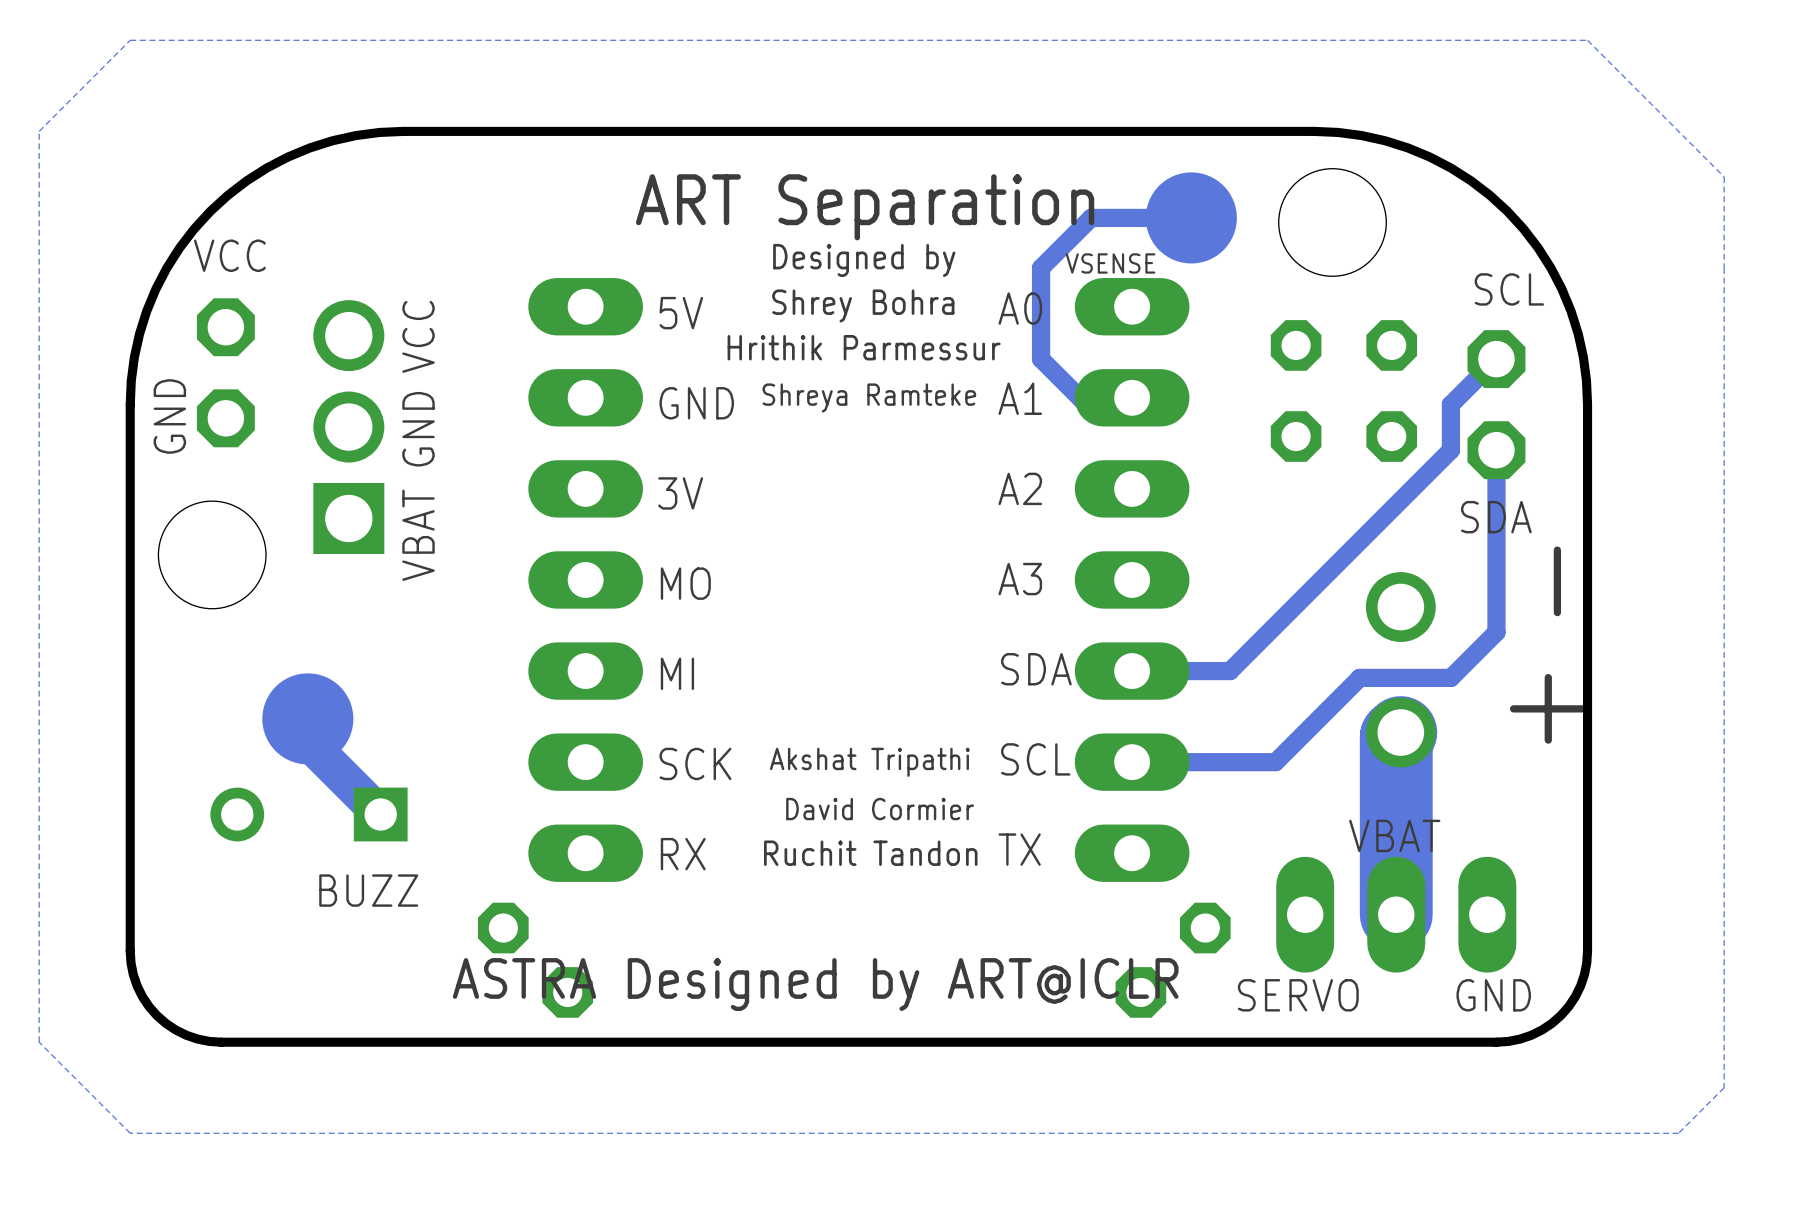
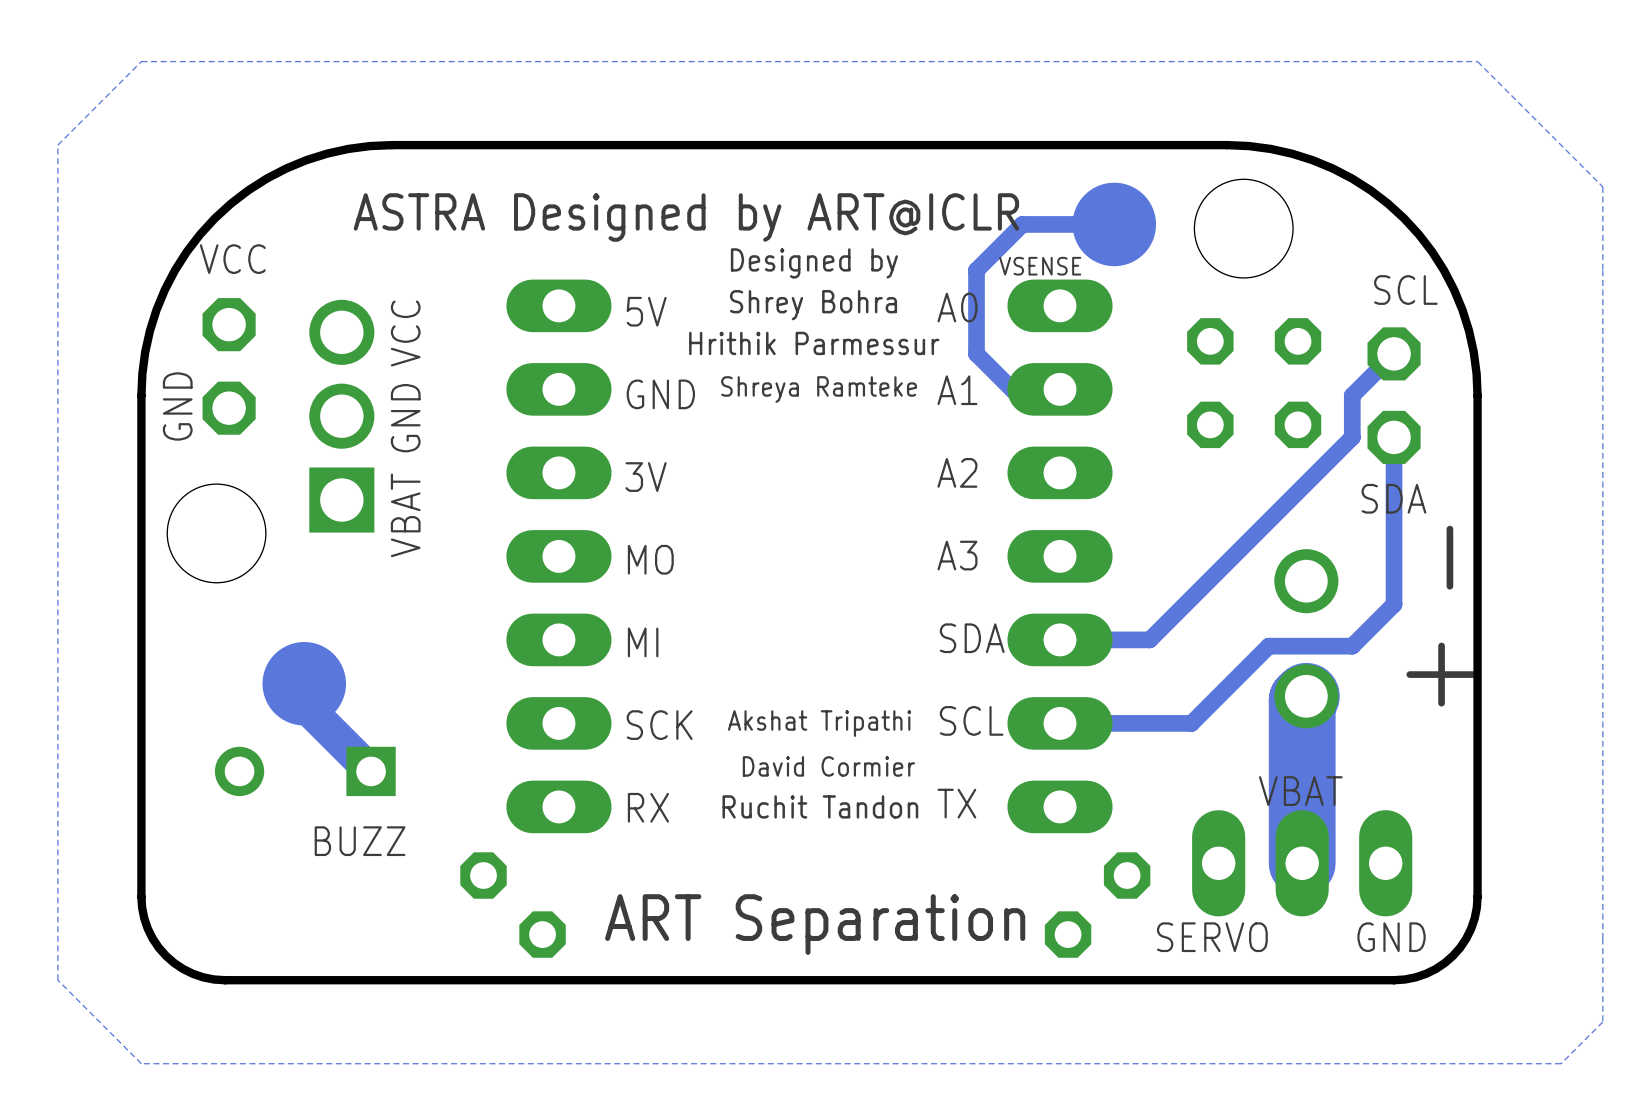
text position: ART Separation (865, 207) -> ART Separation (815, 924)
text position: ASTRA Designed by ART@ICLR (815, 984) -> ASTRA Designed by ART@ICLR (686, 217)

